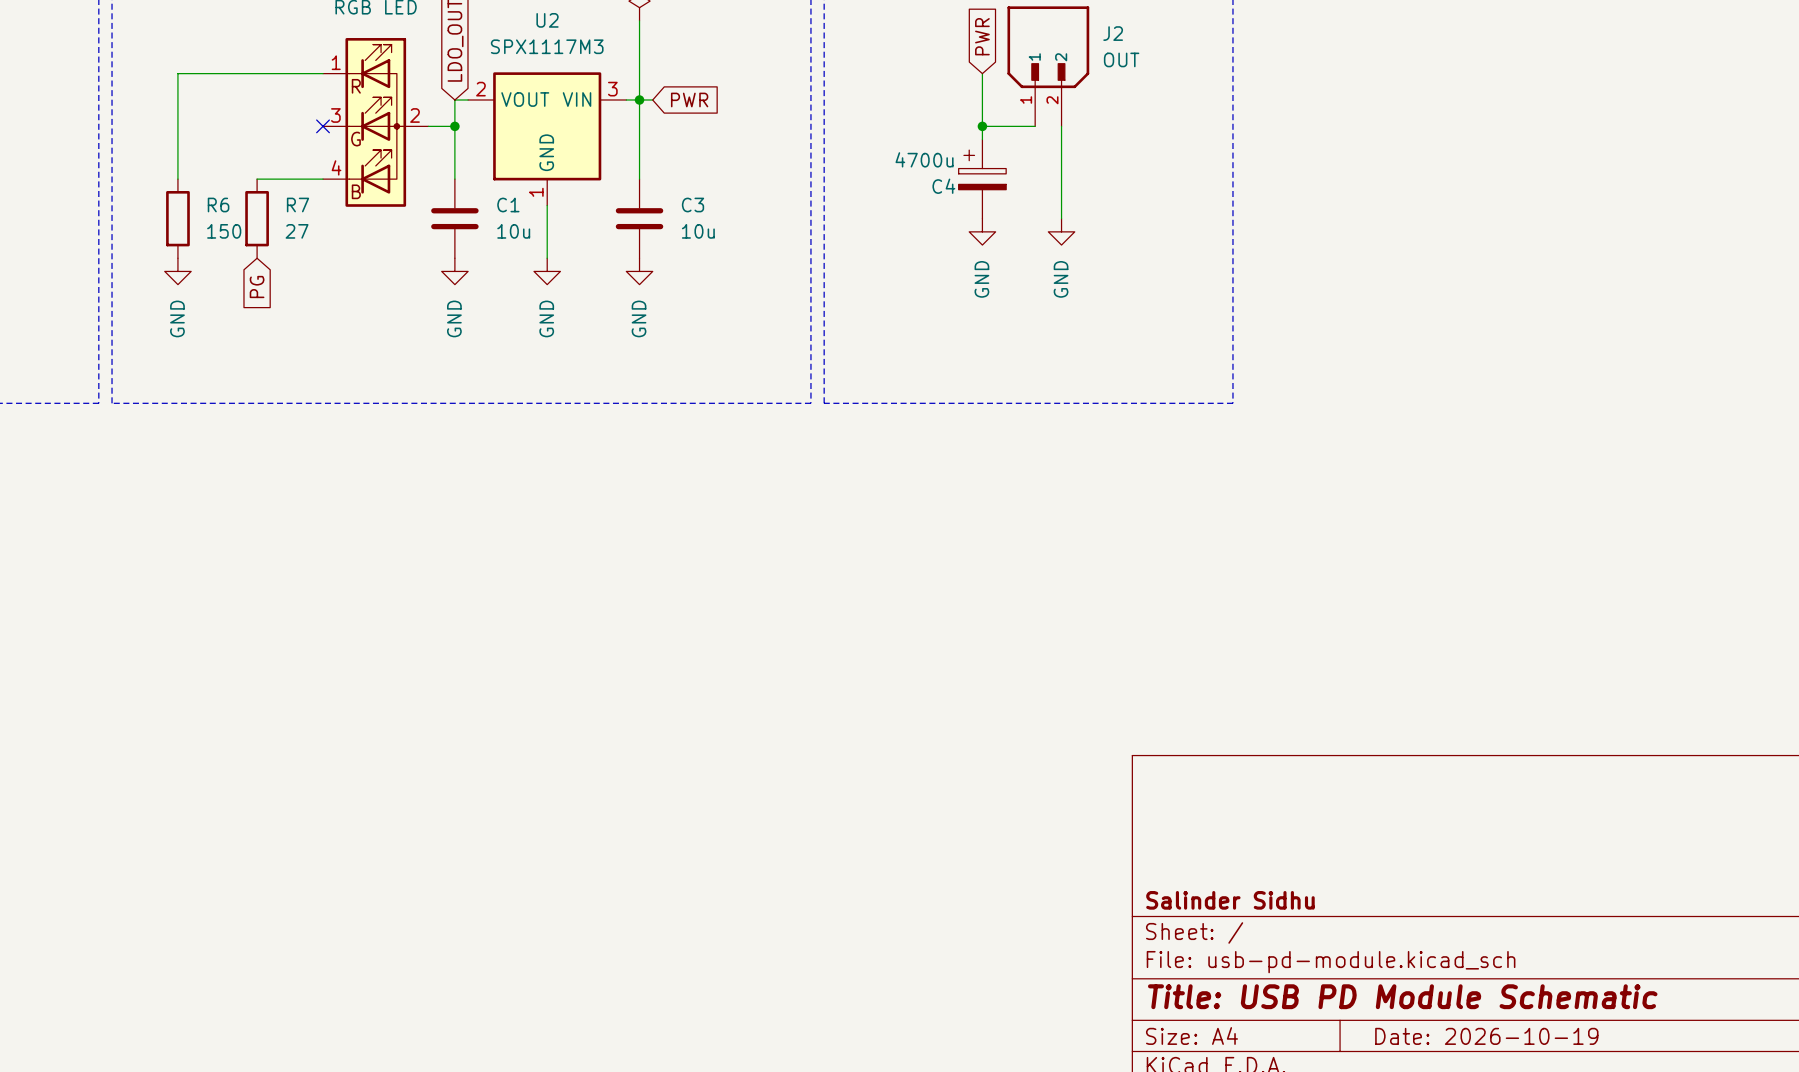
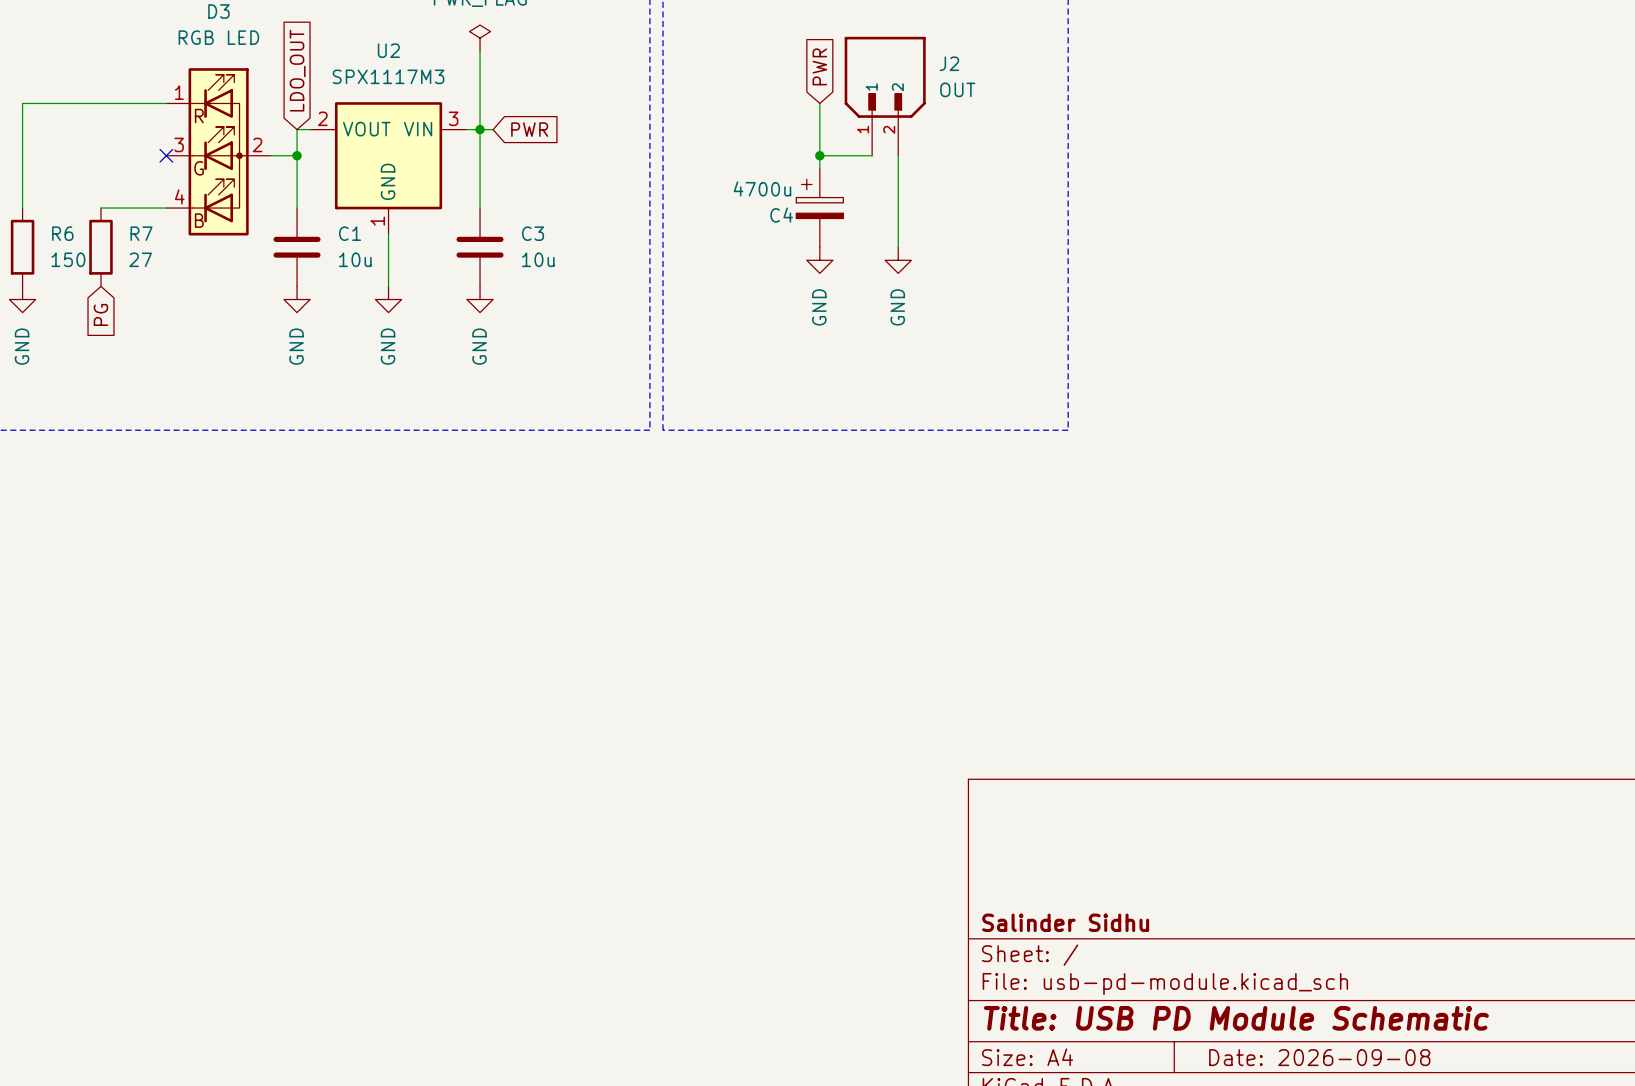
title block: Date: 2026-10-19 (1486, 1036) -> Date: 2026-09-08 (1319, 1057)

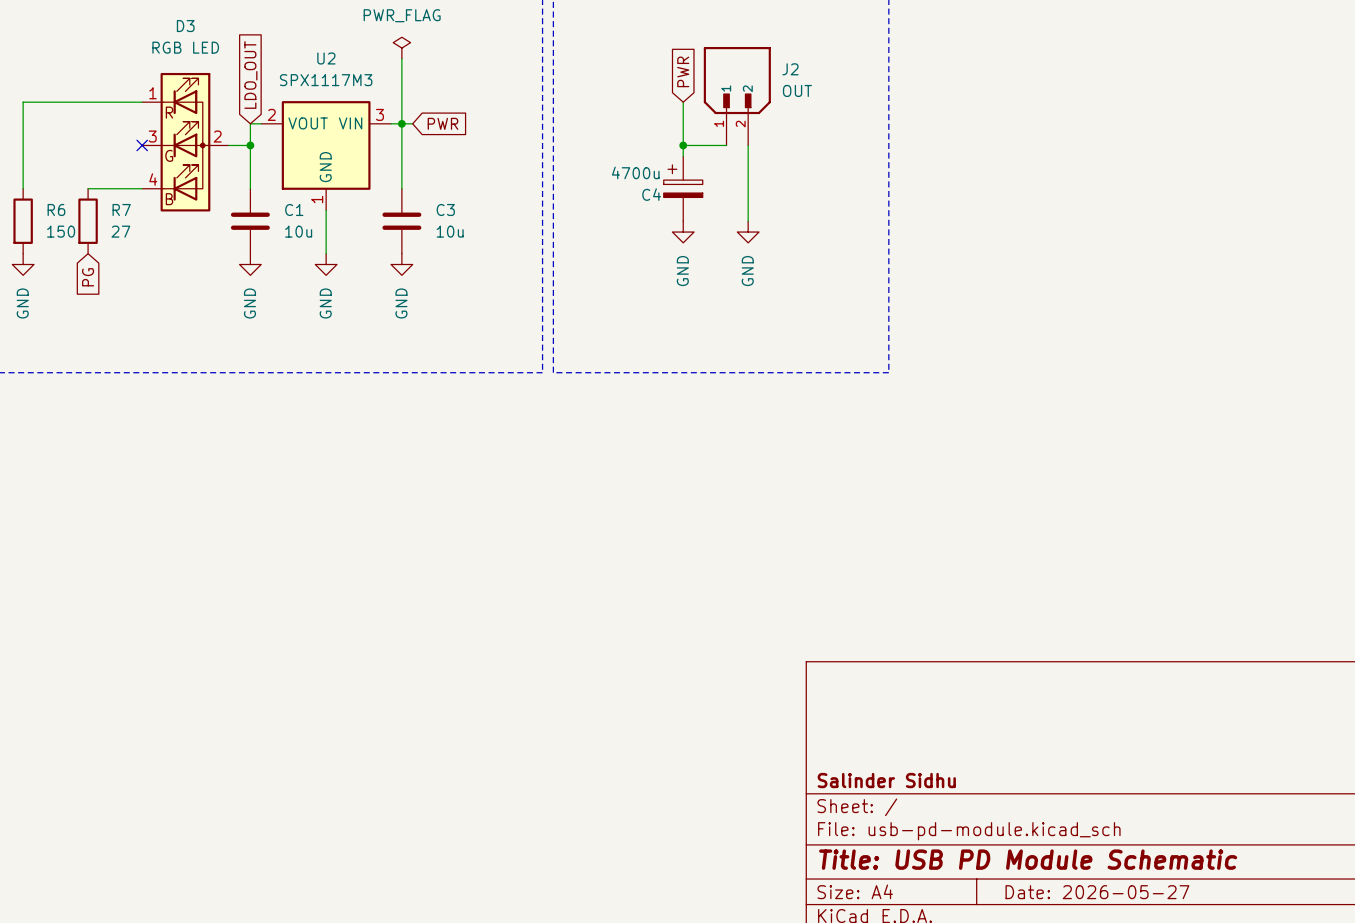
title block: Date: 2026-09-08 (1319, 1057) -> Date: 2026-05-27 (1097, 892)

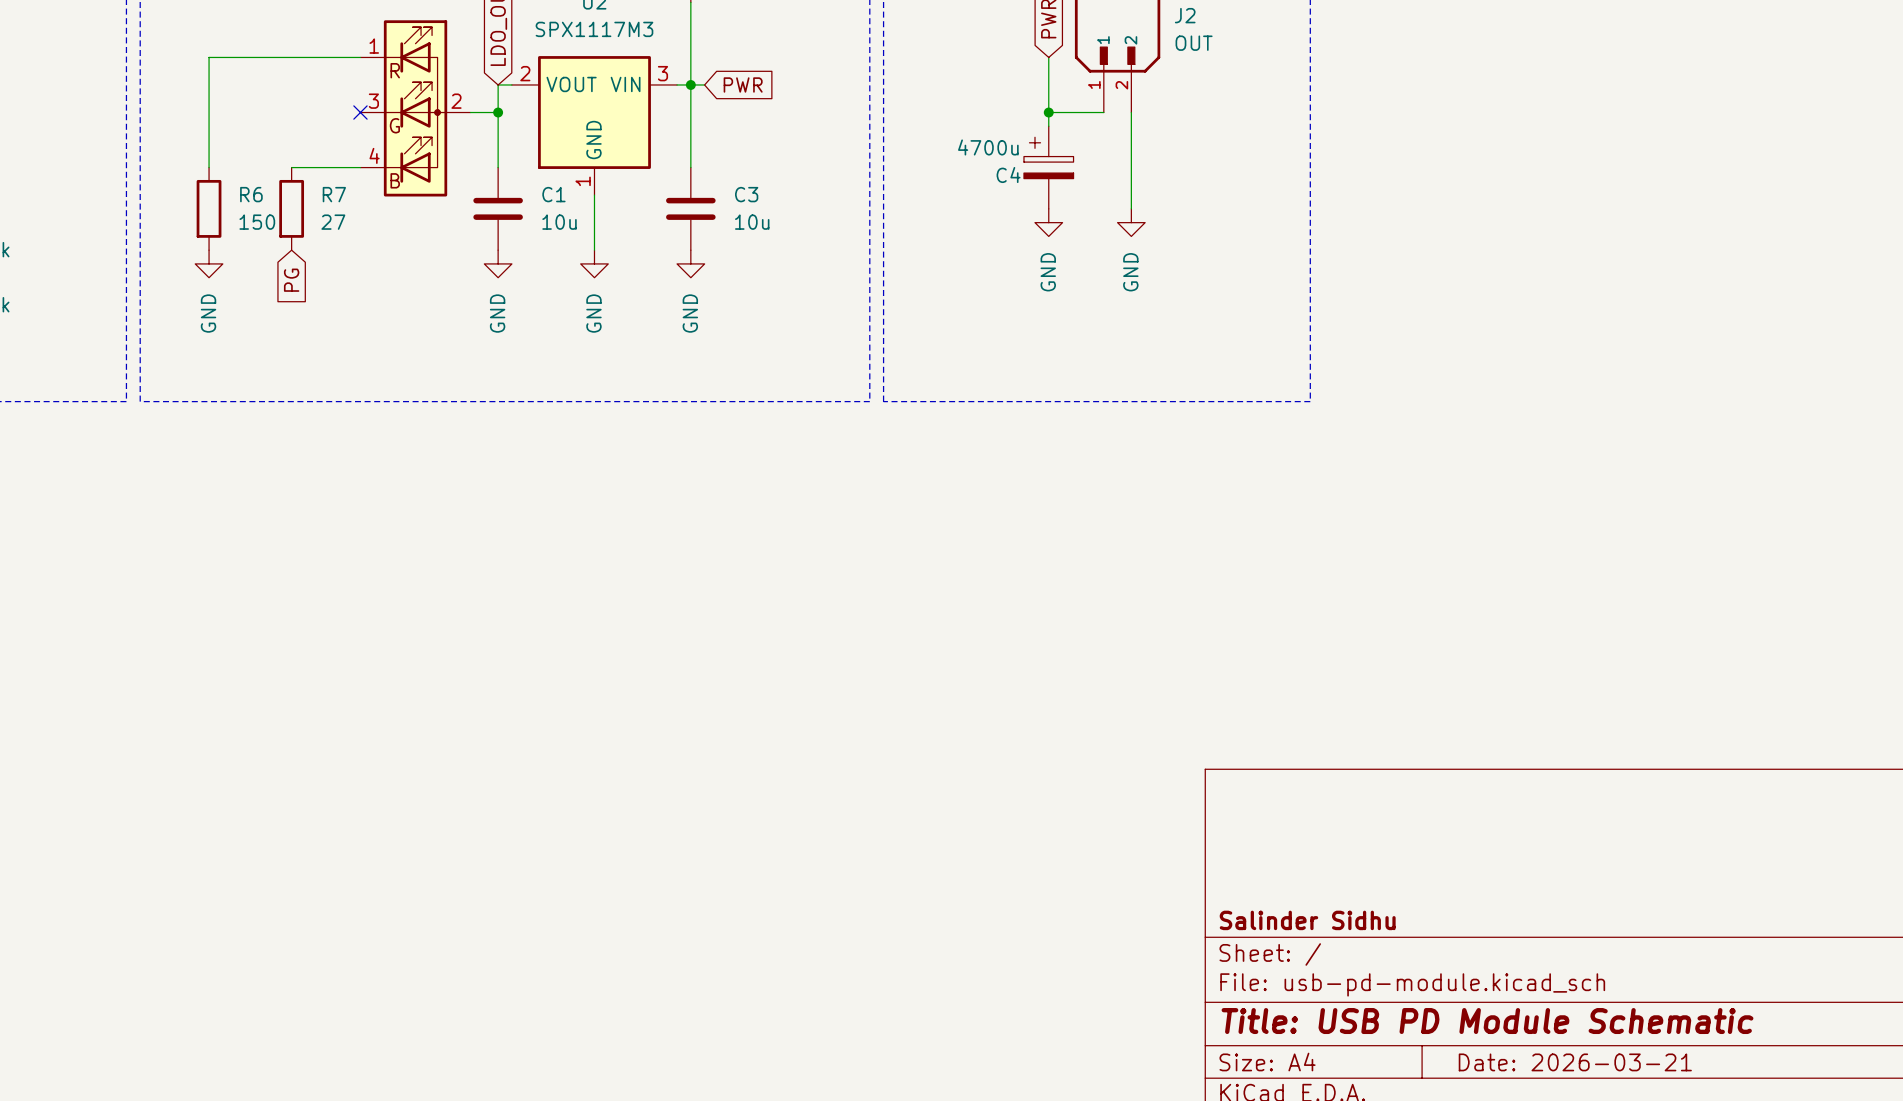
title block: Date: 2026-05-27 (1097, 892) -> Date: 2026-03-21 (1575, 1062)

